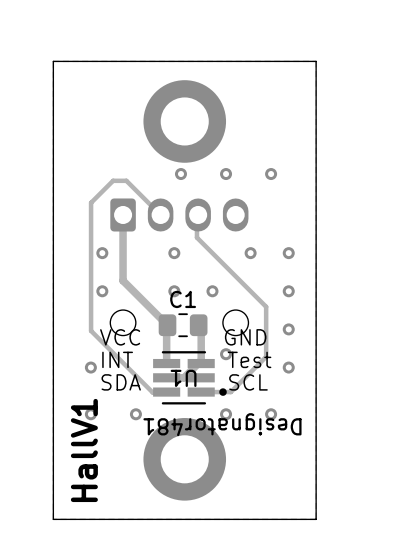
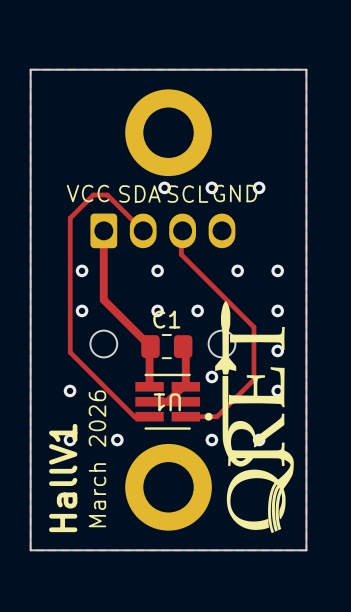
drawing: none -> [215, 301, 294, 533]
text position: VCC (120, 337) -> VCC (87, 193)
text position: GND (245, 337) -> GND (235, 193)
text: INT (117, 359) -> none
text: Test (249, 359) -> none
text position: SDA (121, 382) -> SDA (139, 193)
text position: SCL (248, 382) -> SCL (187, 194)
U1 text: Designator481 (222, 424) -> none
text: none -> March 2026 (97, 458)

